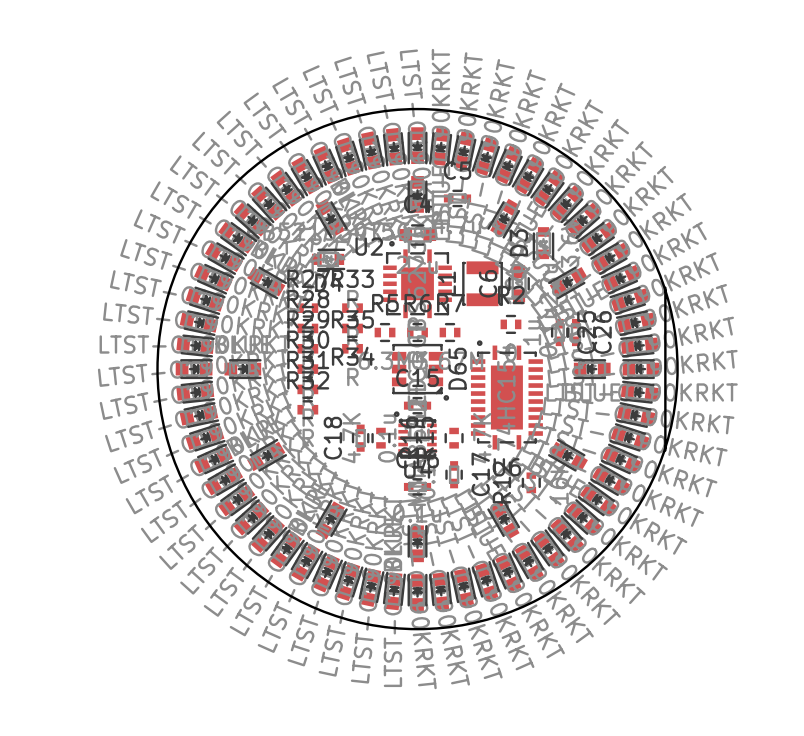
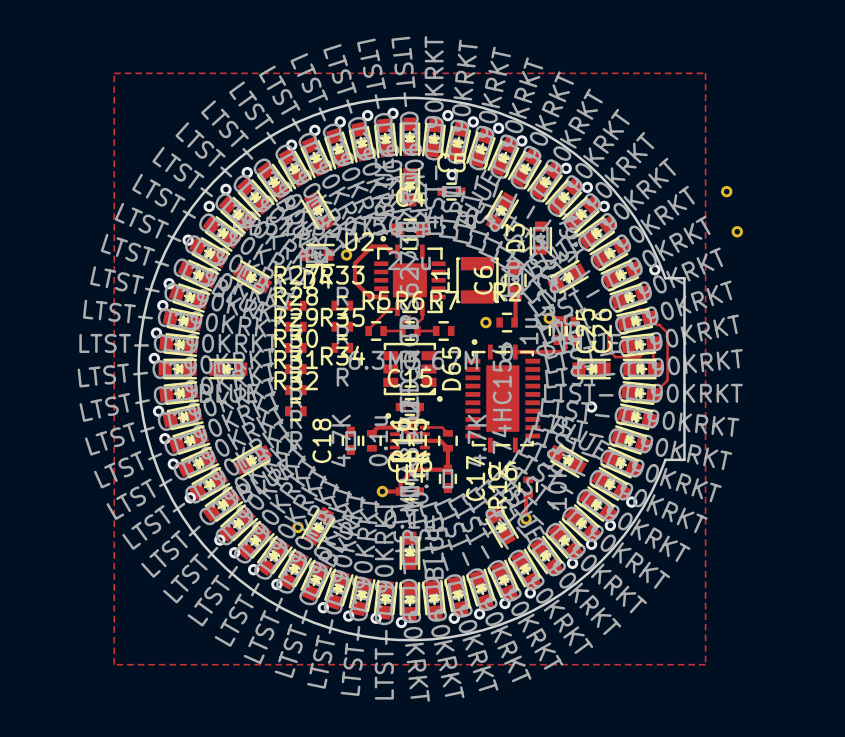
zone outline: none -> (114, 73) (705, 73) (705, 664) (114, 664) (114, 73)
round board edge: [156, 107, 679, 631] -> none
via: none -> (393, 113)
via: none -> (367, 115)
via: none -> (447, 115)
via: none -> (340, 121)
via: none -> (473, 121)
via: none -> (498, 128)
via: none -> (314, 130)
via: none -> (521, 140)
via: none -> (291, 145)
via: none -> (566, 168)
via: none -> (247, 172)
via: none -> (452, 174)
part rotation: 0° (417, 194) -> 180° (409, 187)
via: none -> (587, 187)
via: none -> (225, 189)
part: none -> (726, 191)
via: none -> (209, 206)
via: none -> (604, 206)
part rotation: 0° (331, 218) -> 180° (317, 210)
part rotation: 0° (503, 218) -> 180° (501, 210)
part: none -> (737, 231)
via: none -> (188, 240)
track: none -> (397, 251) (390, 251) (385, 246) (371, 246) (354, 263) (354, 282) (369, 296) (381, 296)
part: none -> (346, 254)
via: none -> (654, 269)
board edge: none -> (665, 278) (684, 278) (684, 459) (665, 459) (651, 491) (634, 521) (613, 548) (588, 572) (546, 603) (499, 624) (449, 637) (398, 639) (346, 632) (298, 616) (267, 599) (239, 579) (202, 543) (173, 501) (152, 453) (140, 403) (139, 351) (147, 300) (165, 252) (191, 207) (226, 169) (267, 138) (313, 115) (363, 101) (415, 97) (466, 103) (499, 113) (531, 126) (575, 154) (613, 189) (643, 231) (665, 278)
part rotation: 0° (267, 282) -> 180° (251, 276)
part rotation: 0° (567, 282) -> 180° (568, 276)
via: none -> (169, 283)
board edge: (665, 287) (665, 450) -> none
track: none -> (515, 292) (514, 322)
via: none -> (162, 305)
track: none -> (397, 309) (388, 309) (368, 331)
track: none -> (422, 309) (422, 318) (417, 323) (417, 331) (436, 331)
track: none -> (638, 309) (641, 309) (667, 333) (667, 380) (653, 394)
track: none -> (409, 316) (402, 323) (402, 331) (383, 331)
track: none -> (549, 318) (565, 318) (565, 347) (561, 352) (515, 352)
part: none -> (549, 318)
part: none -> (485, 322)
via: none -> (156, 333)
track: none -> (608, 333) (608, 350) (615, 357) (639, 357) (653, 343) (654, 369)
via: none -> (154, 358)
part rotation: 0° (243, 369) -> 180° (228, 369)
part rotation: 0° (592, 369) -> 180° (591, 369)
track: none -> (419, 407) (419, 414) (412, 421) (412, 428) (416, 433) (424, 434)
via: none -> (591, 407)
via: none -> (158, 411)
track: none -> (424, 427) (442, 427) (447, 433)
track: none -> (371, 433) (377, 427) (402, 427) (415, 440) (440, 440) (447, 448) (447, 469) (414, 469) (400, 483) (400, 491) (382, 491)
via: none -> (164, 438)
part rotation: 0° (267, 455) -> 180° (251, 461)
part rotation: 0° (567, 455) -> 180° (568, 461)
via: none -> (173, 464)
part: none -> (382, 491)
track: none -> (528, 494) (526, 496) (526, 518)
via: none -> (190, 497)
via: none -> (631, 502)
part: none -> (526, 518)
part rotation: 0° (331, 519) -> 180° (317, 527)
part rotation: 0° (503, 519) -> 180° (501, 527)
via: none -> (610, 525)
part: none -> (297, 527)
via: none -> (219, 540)
via: none -> (591, 544)
part rotation: 0° (417, 543) -> 180° (409, 550)
via: none -> (234, 552)
via: none -> (572, 563)
via: none -> (253, 569)
via: none -> (276, 584)
via: none -> (530, 592)
via: none -> (504, 603)
via: none -> (323, 607)
via: none -> (479, 614)
via: none -> (348, 616)
via: none -> (376, 618)
via: none -> (454, 618)
via: none -> (401, 622)

